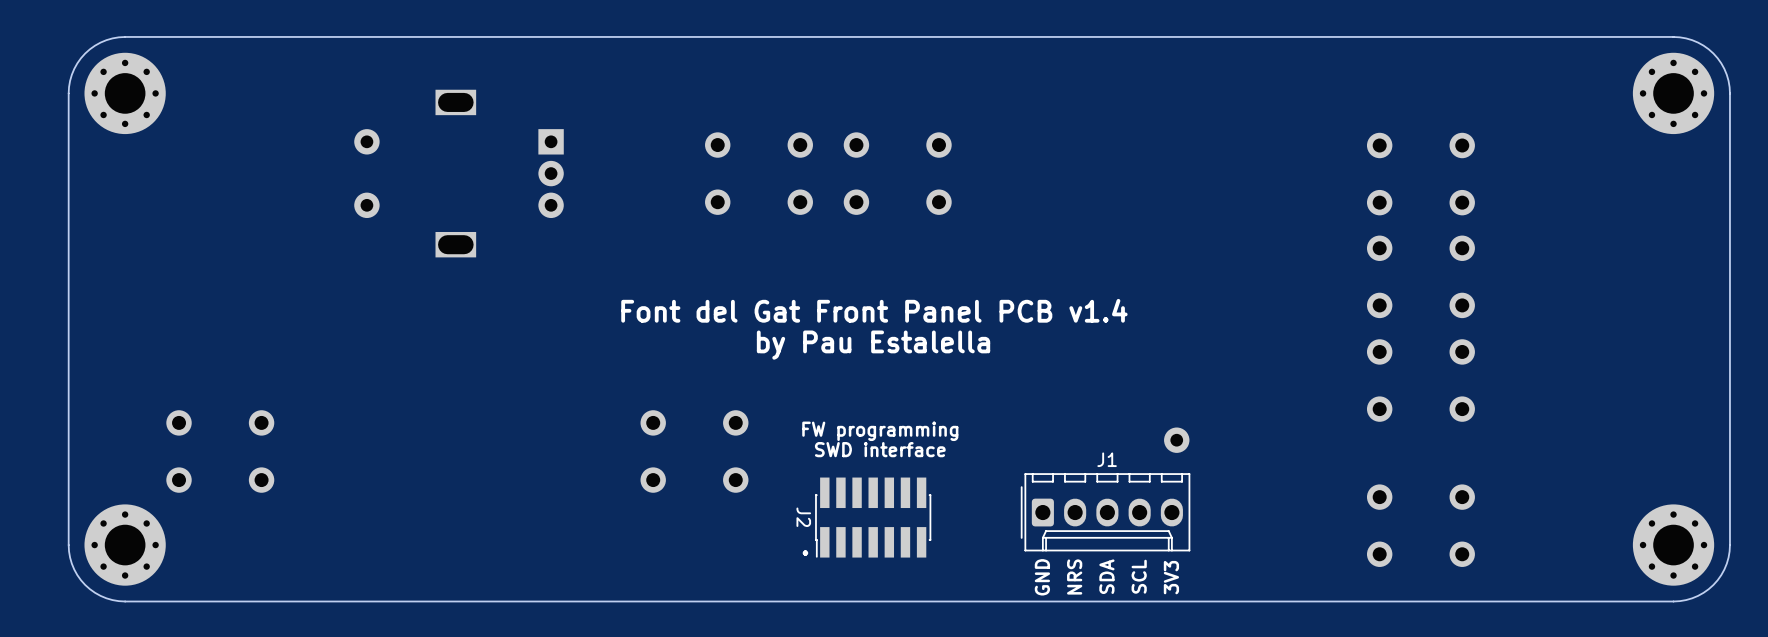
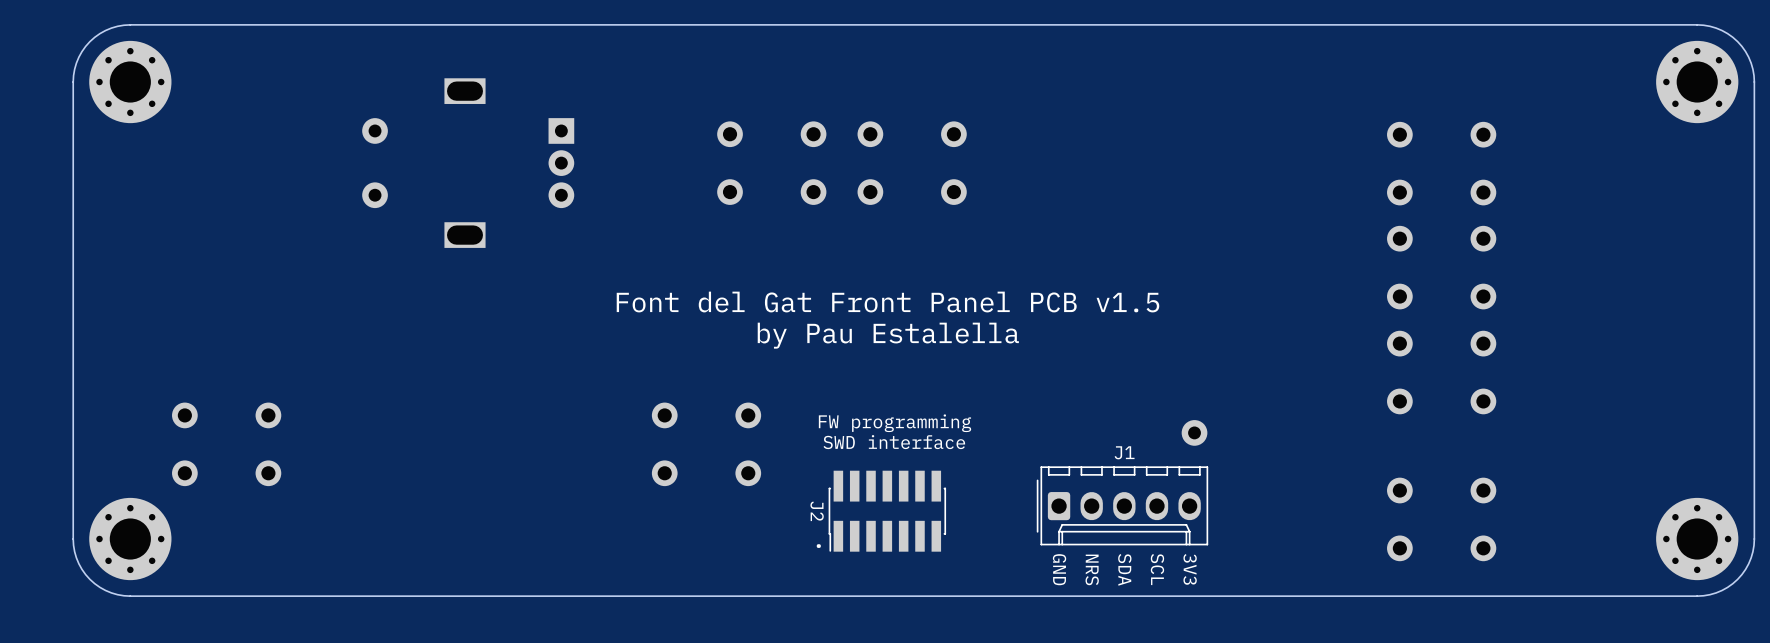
text: Font del Gat Front Panel PCB v1.4 (874, 310) -> Font del Gat Front Panel PCB v1.5 (887, 302)
text rotation: 0° (1106, 576) -> 180° (1124, 569)
text rotation: 0° (1139, 576) -> 180° (1157, 569)
text rotation: 0° (1042, 577) -> 180° (1059, 569)
text rotation: 0° (1074, 577) -> 180° (1092, 569)
text rotation: 0° (1171, 577) -> 180° (1190, 569)

